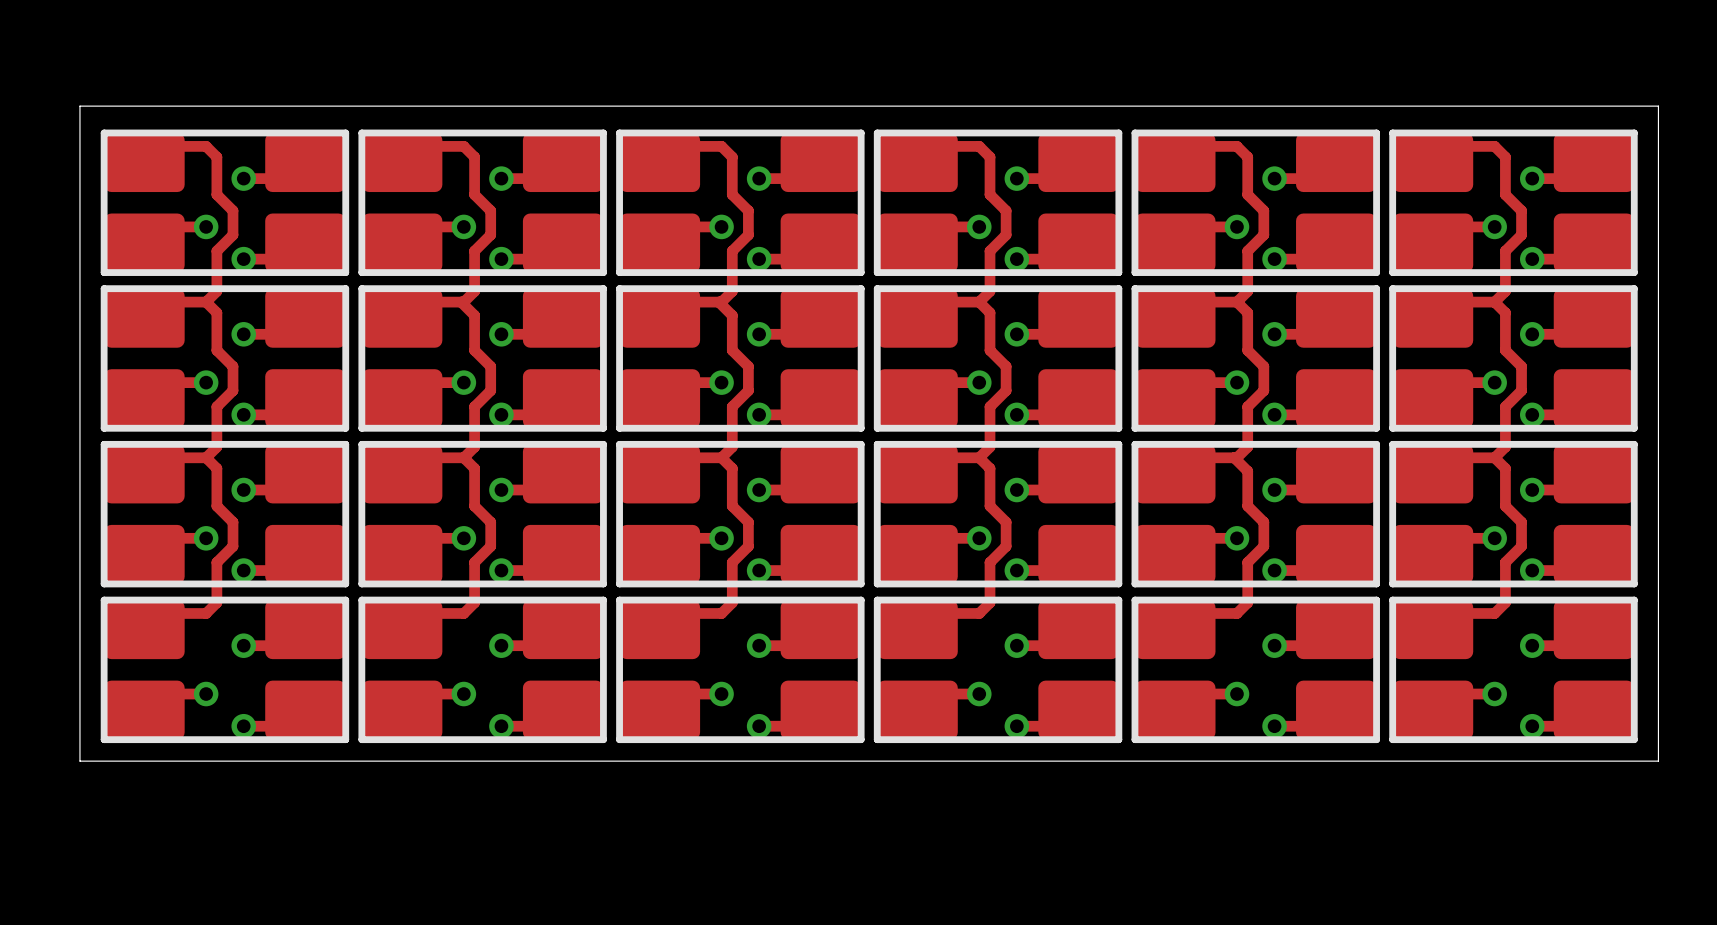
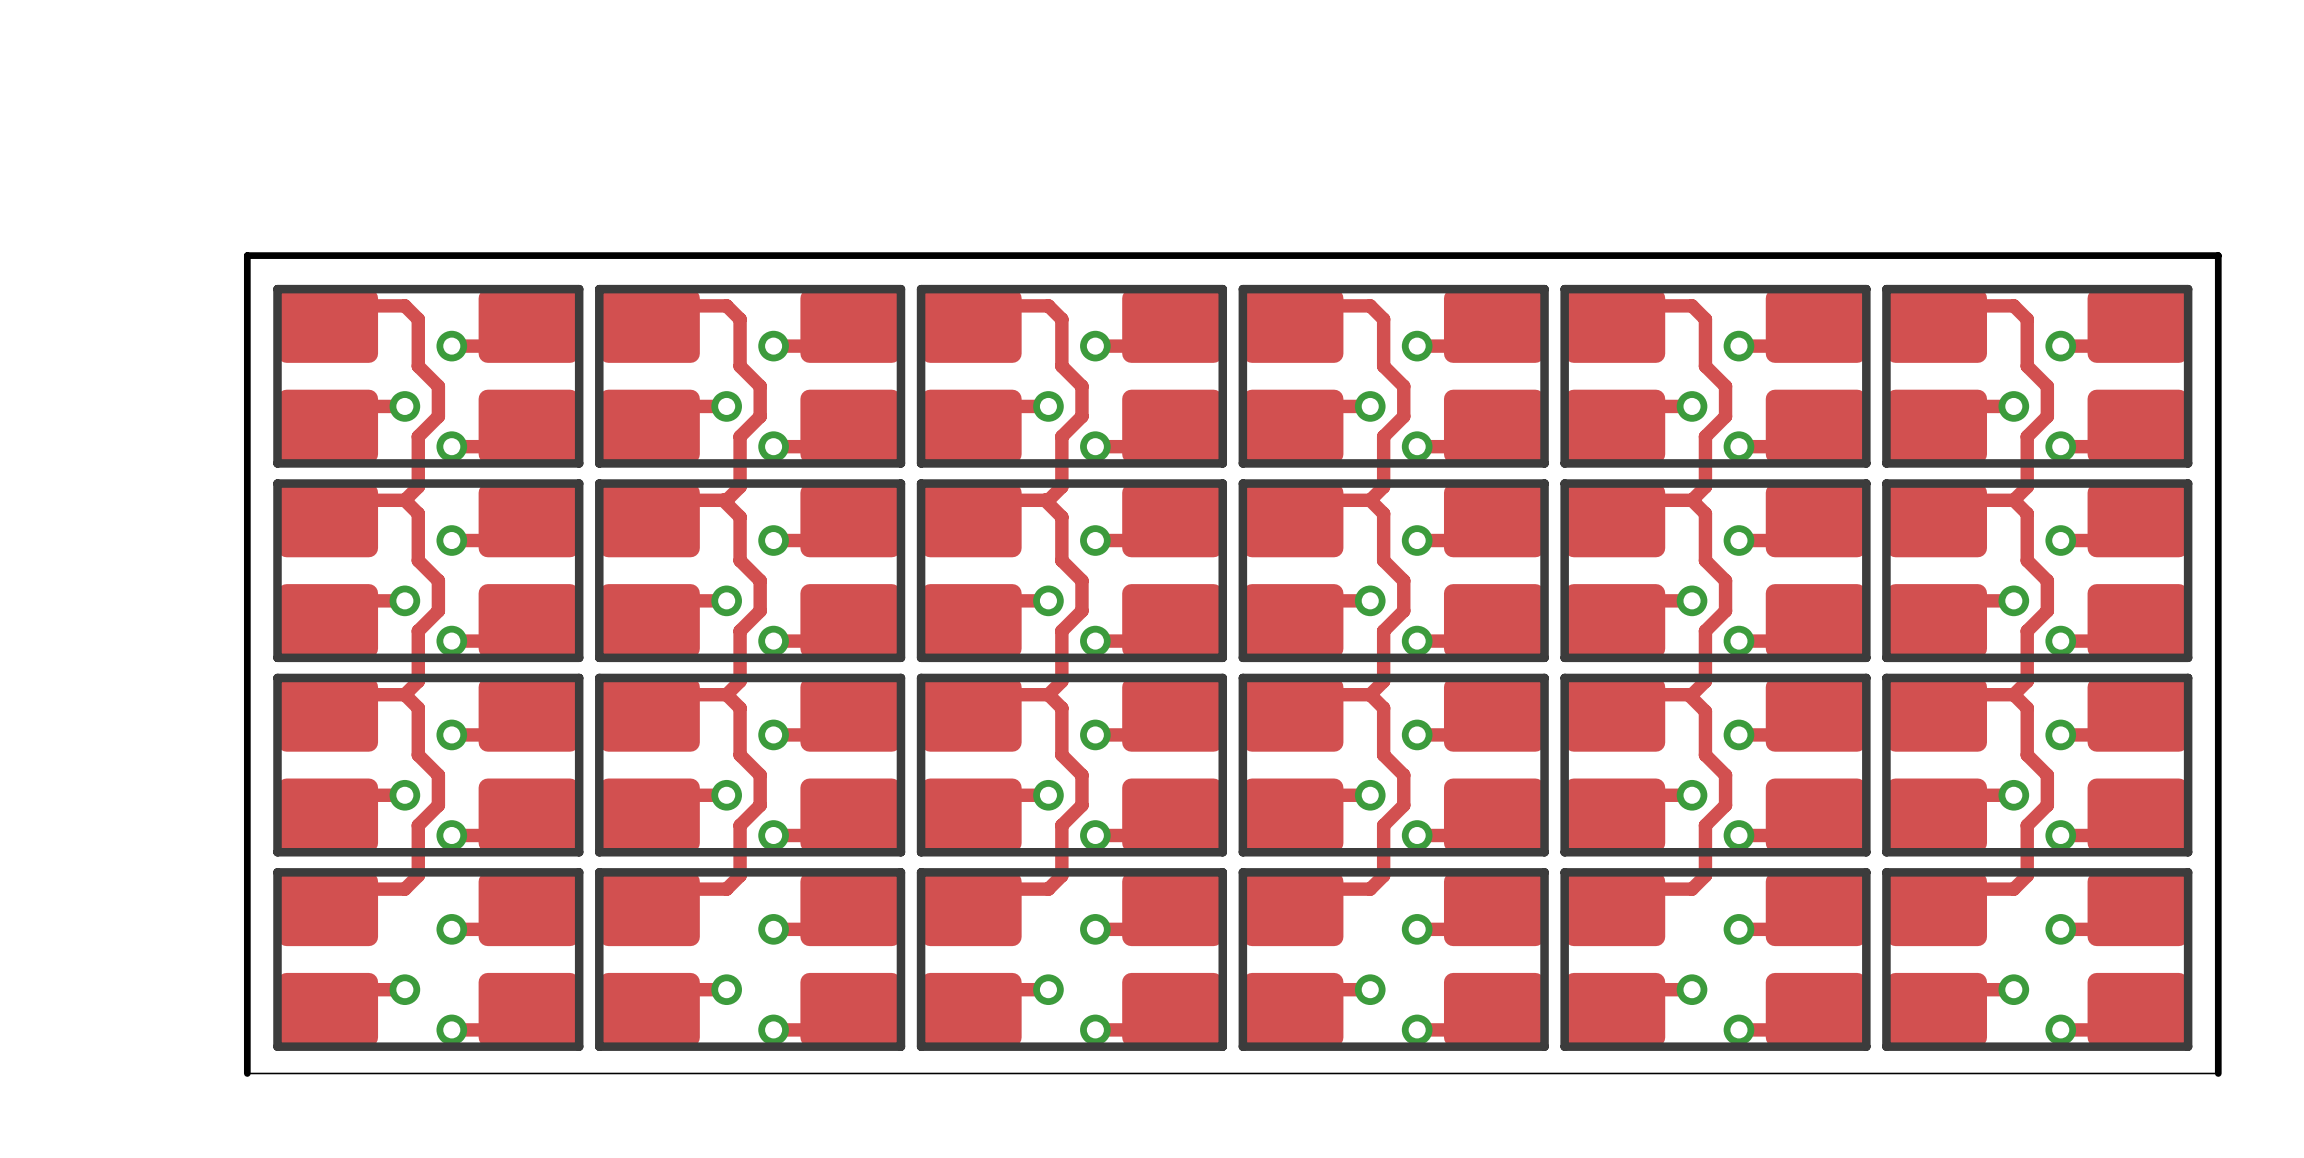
board edge width: thin (79, 761) (79, 106) (1658, 106) (1658, 761) -> thick (247, 1073) (247, 255) (2218, 255) (2218, 1073)

